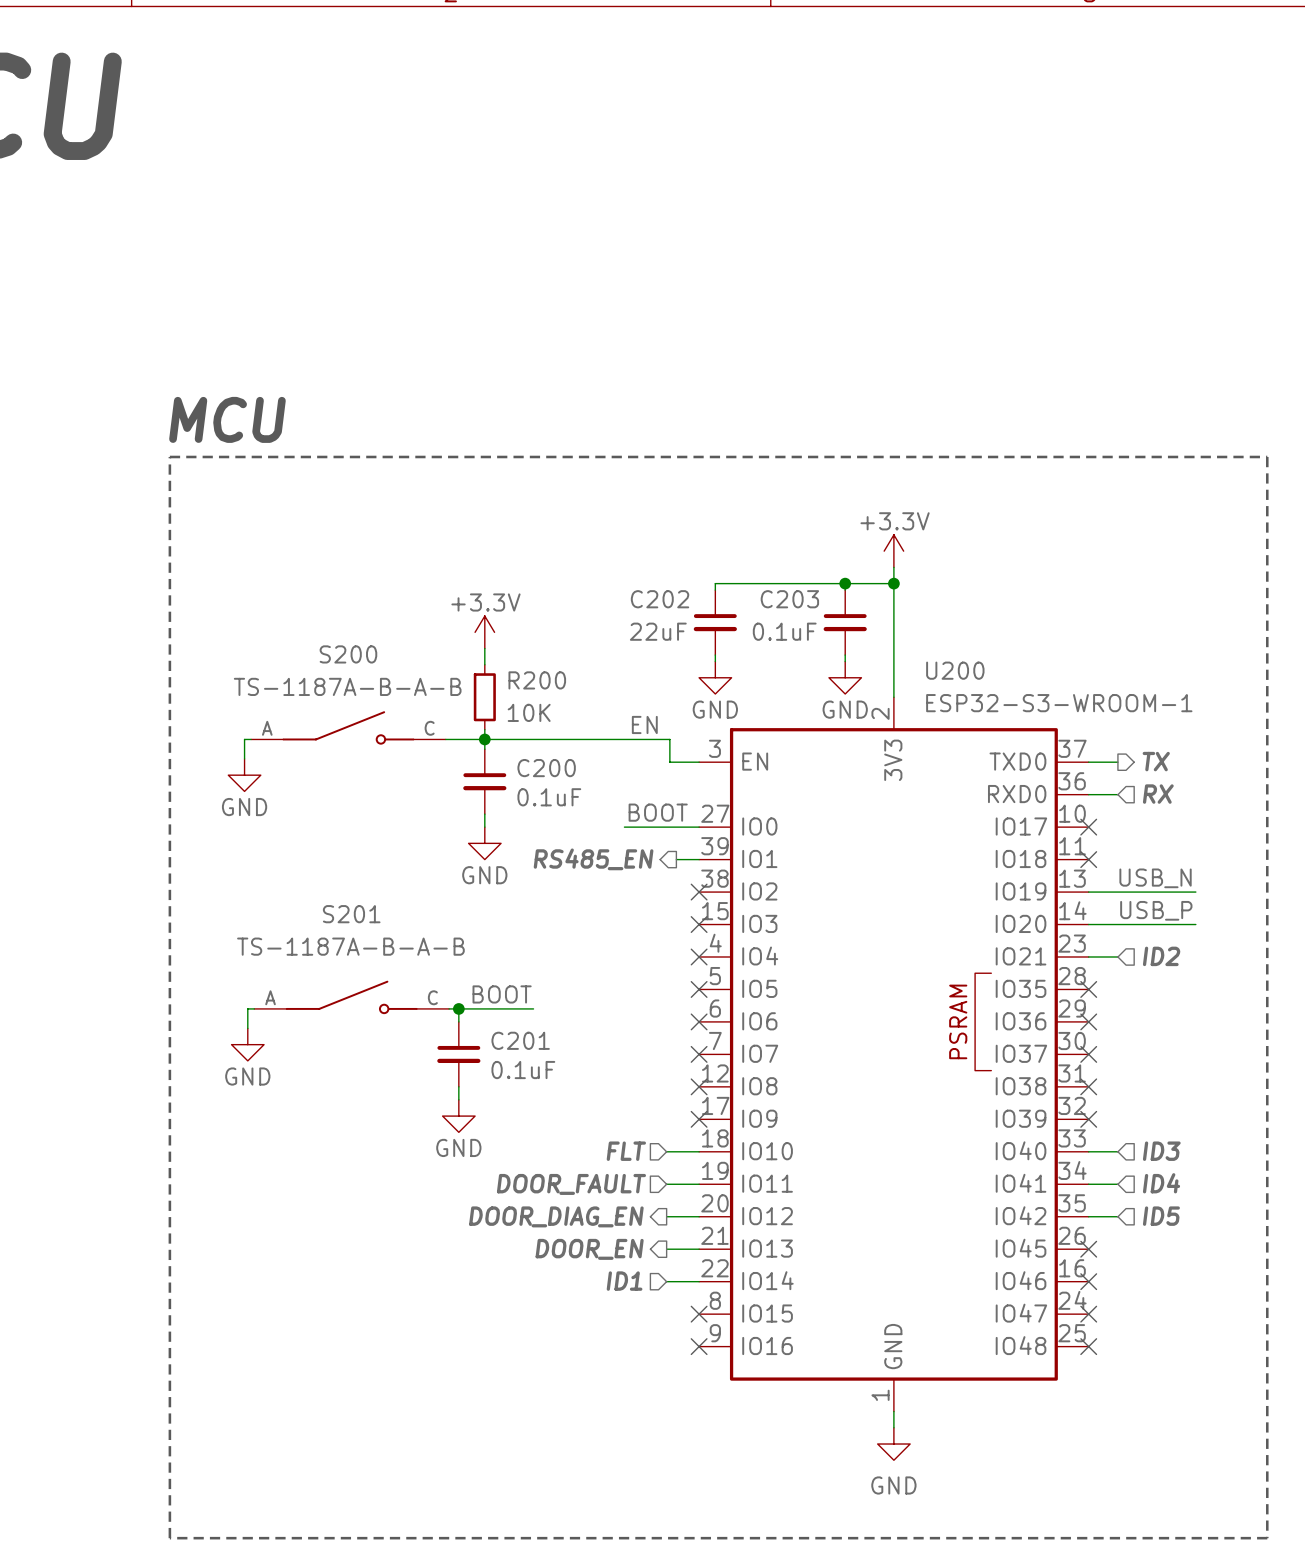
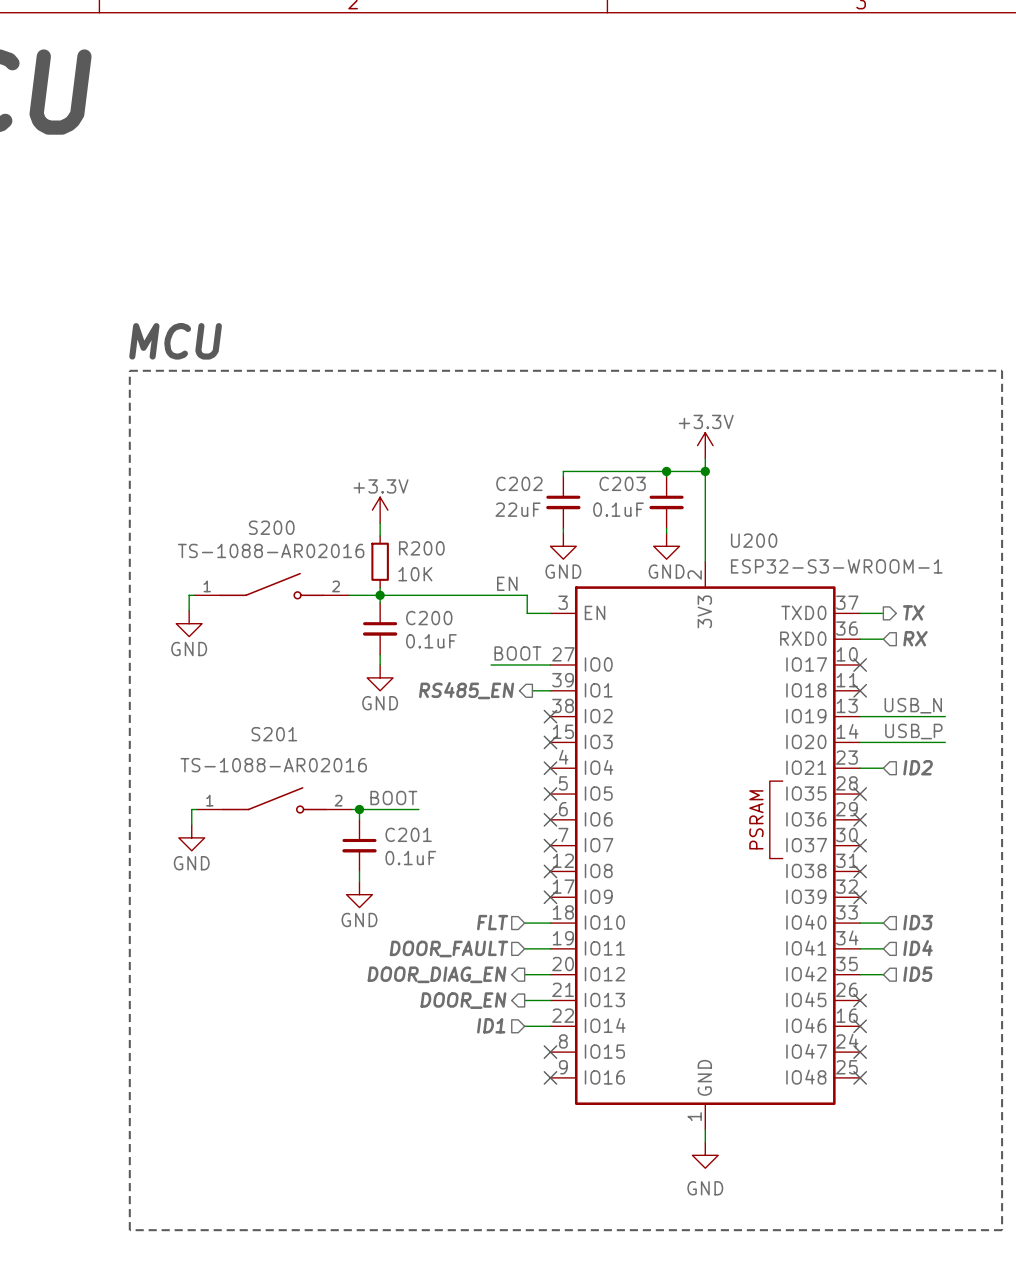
S200 value: TS-1187A-B-A-B (347, 686) -> TS-1088-AR02016 (271, 550)
S200 pin number: A (267, 728) -> 1 (207, 586)
S200 pin number: C (429, 728) -> 2 (336, 586)
S201 value: TS-1187A-B-A-B (350, 946) -> TS-1088-AR02016 (273, 765)
S201 pin number: A (270, 997) -> 1 (209, 800)
S201 pin number: C (432, 997) -> 2 (338, 800)

